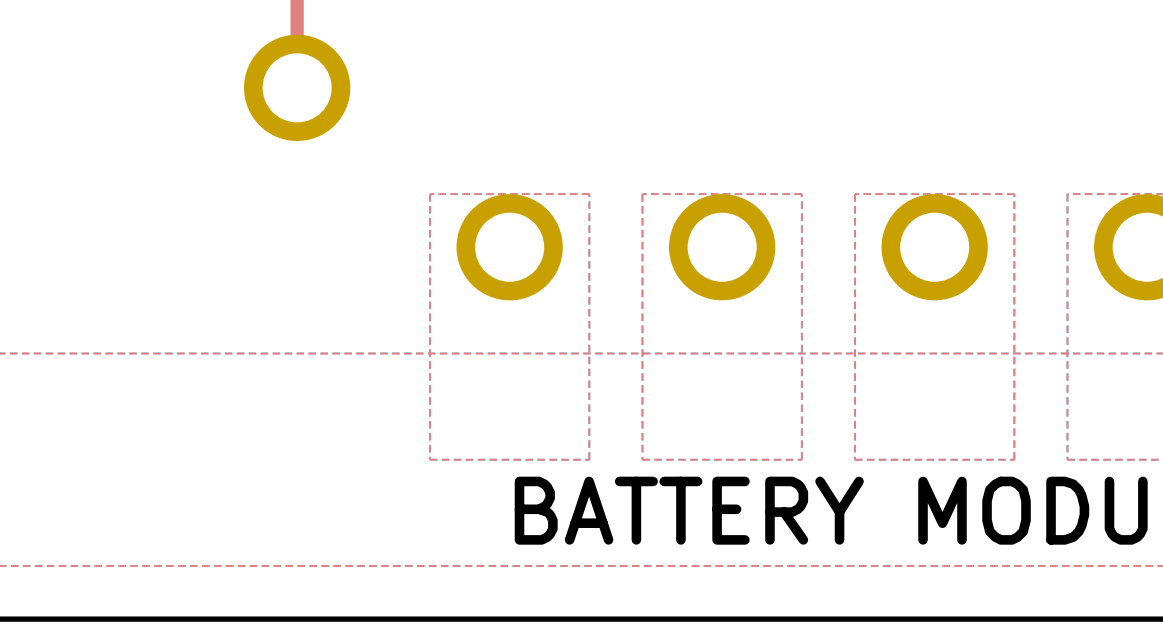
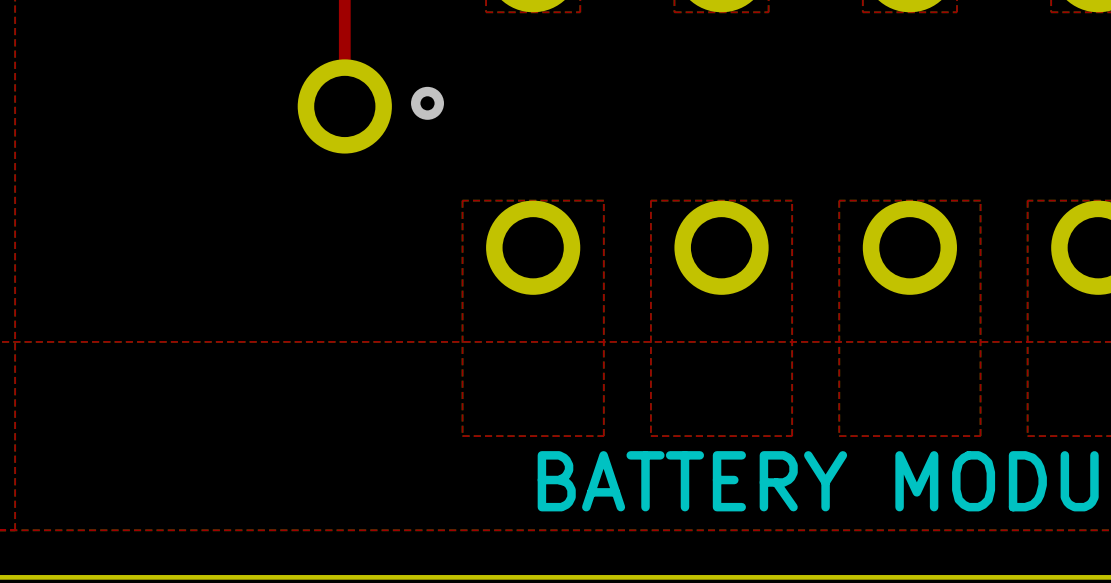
via: none -> (427, 103)

